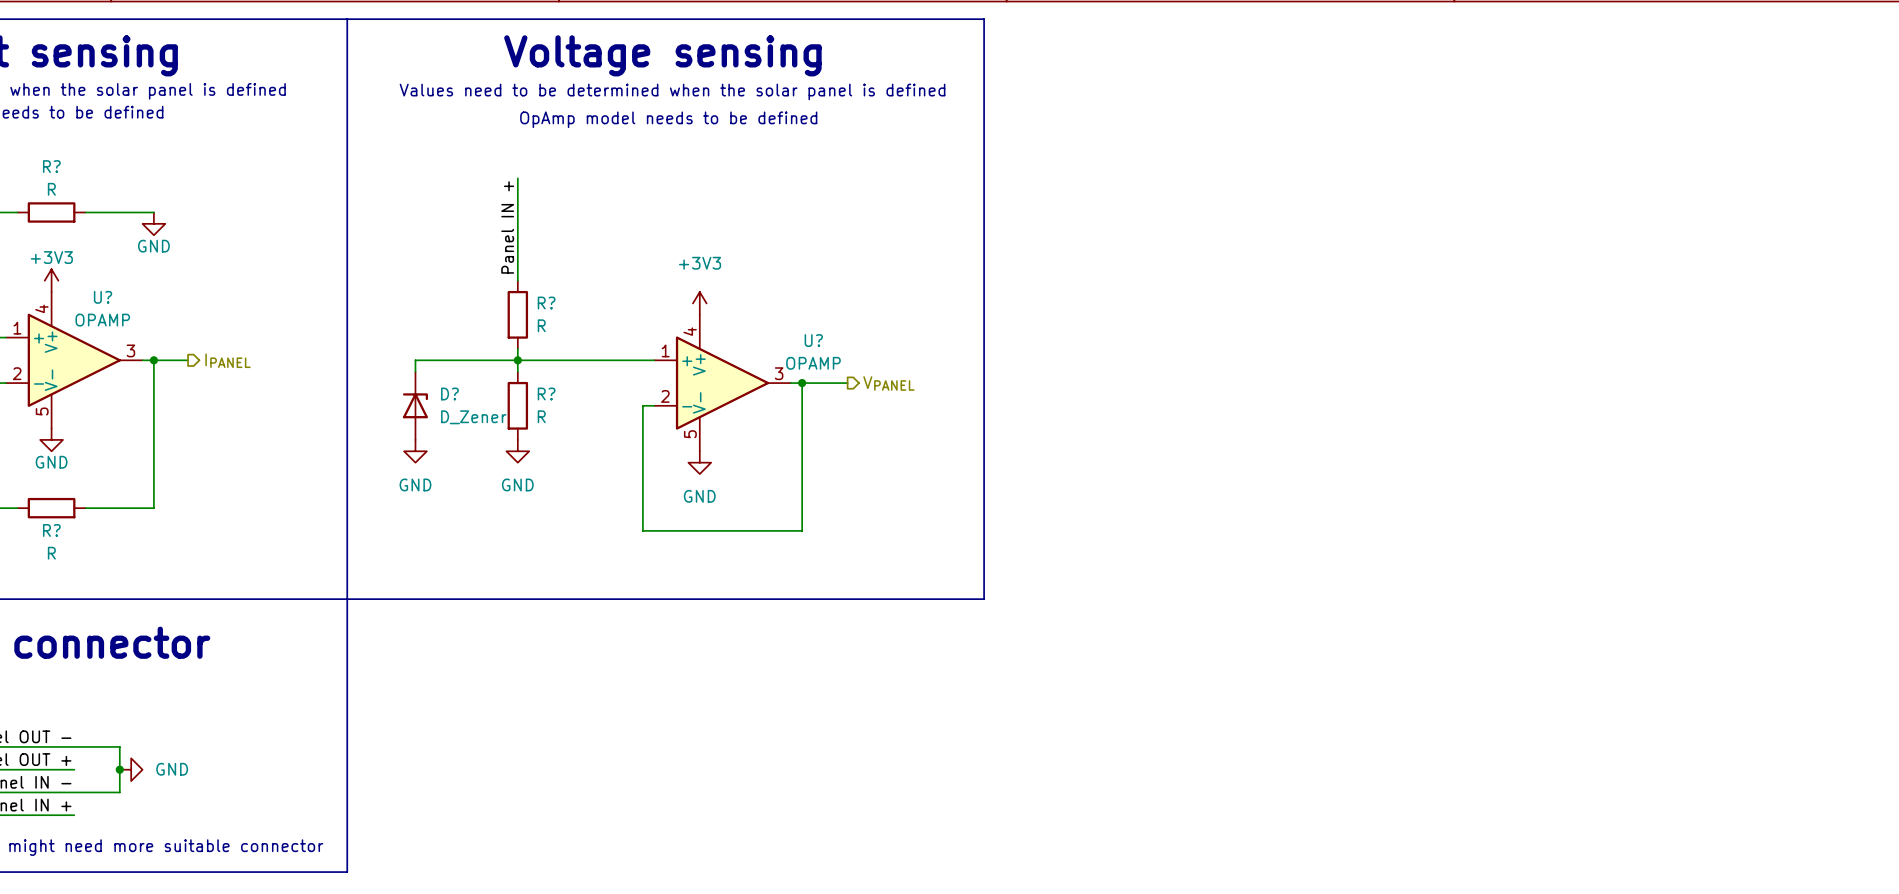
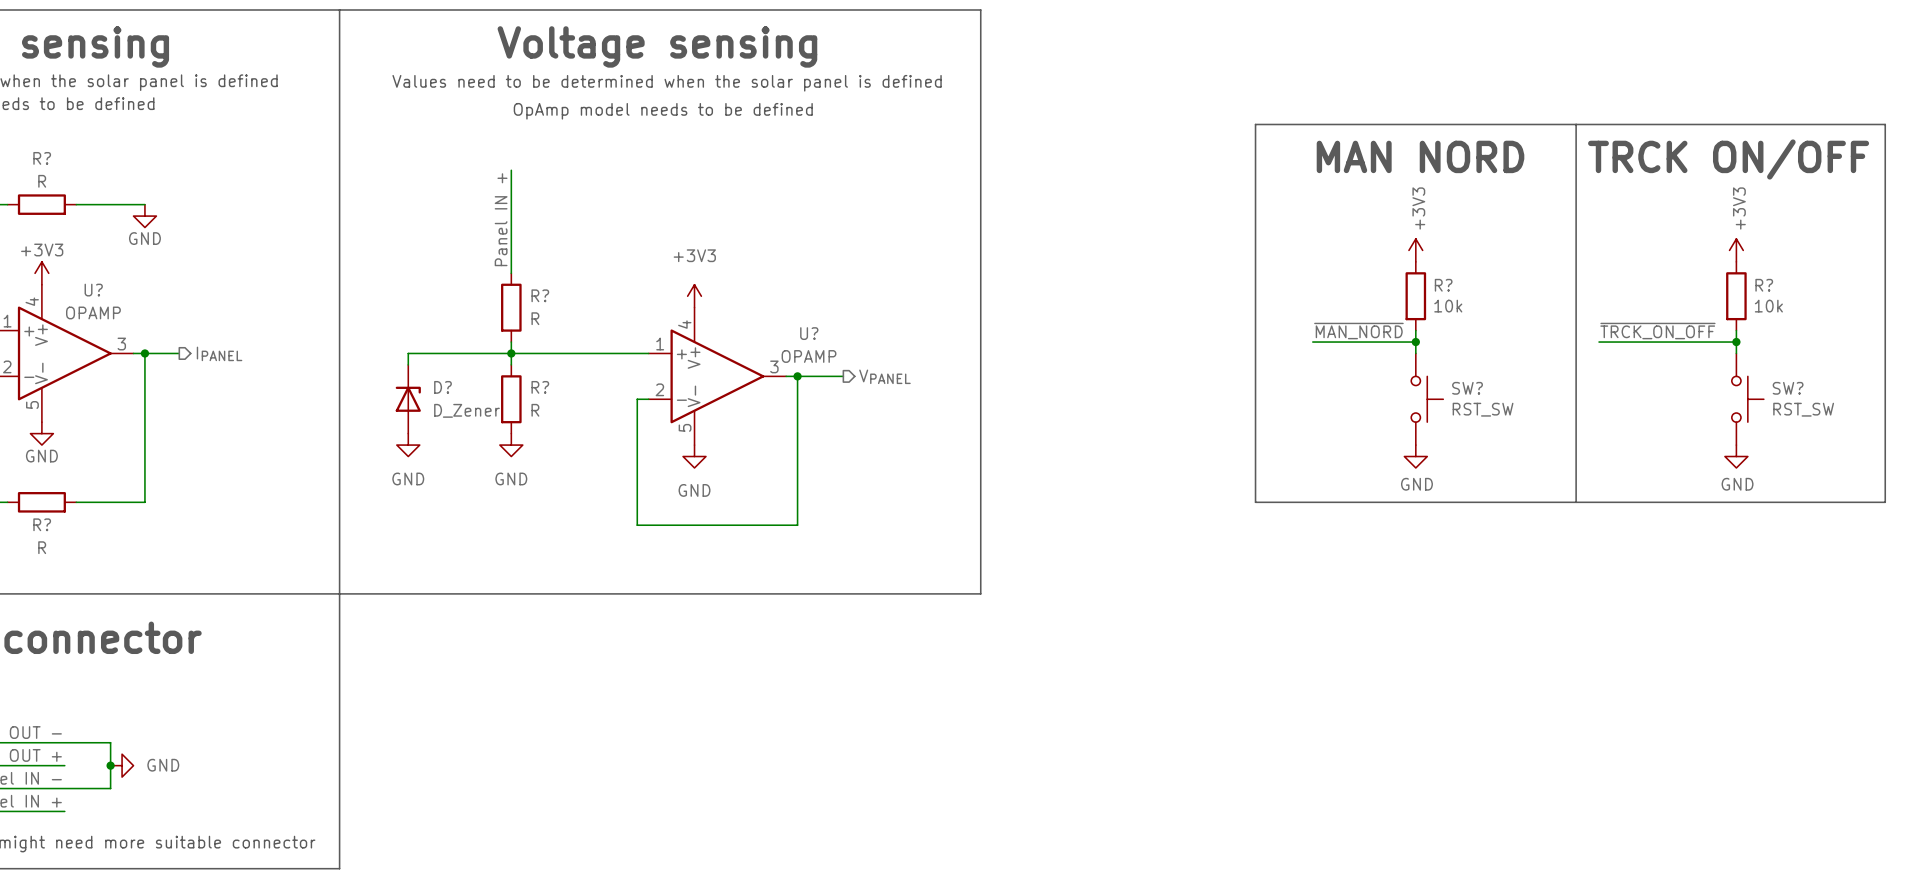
line: none -> (1255, 124) (1255, 502) (1885, 502) (1885, 124) (1255, 124)
line: none -> (1576, 124) (1576, 502)
text: none -> MAN NORD (1420, 156)
text: none -> TRCK ON/OFF (1728, 159)
power symbol: none -> +3V3 (1415, 250)
power symbol: none -> +3V3 (1736, 250)
R?: none -> 10k (1415, 296)
R?: none -> 10k (1736, 296)
wire: none -> (1415, 330) (1415, 353)
wire: none -> (1736, 330) (1736, 353)
label: none -> ~{MAN_NORD} (1358, 331)
label: none -> ~{TRCK_ON_OFF} (1657, 331)
wire: none -> (1312, 342) (1415, 342)
junction: none -> (1415, 342)
wire: none -> (1599, 342) (1736, 342)
junction: none -> (1736, 342)
SW?: none -> RST_SW (1427, 399)
SW?: none -> RST_SW (1747, 399)
power symbol: none -> GND (1415, 456)
power symbol: none -> GND (1736, 456)

